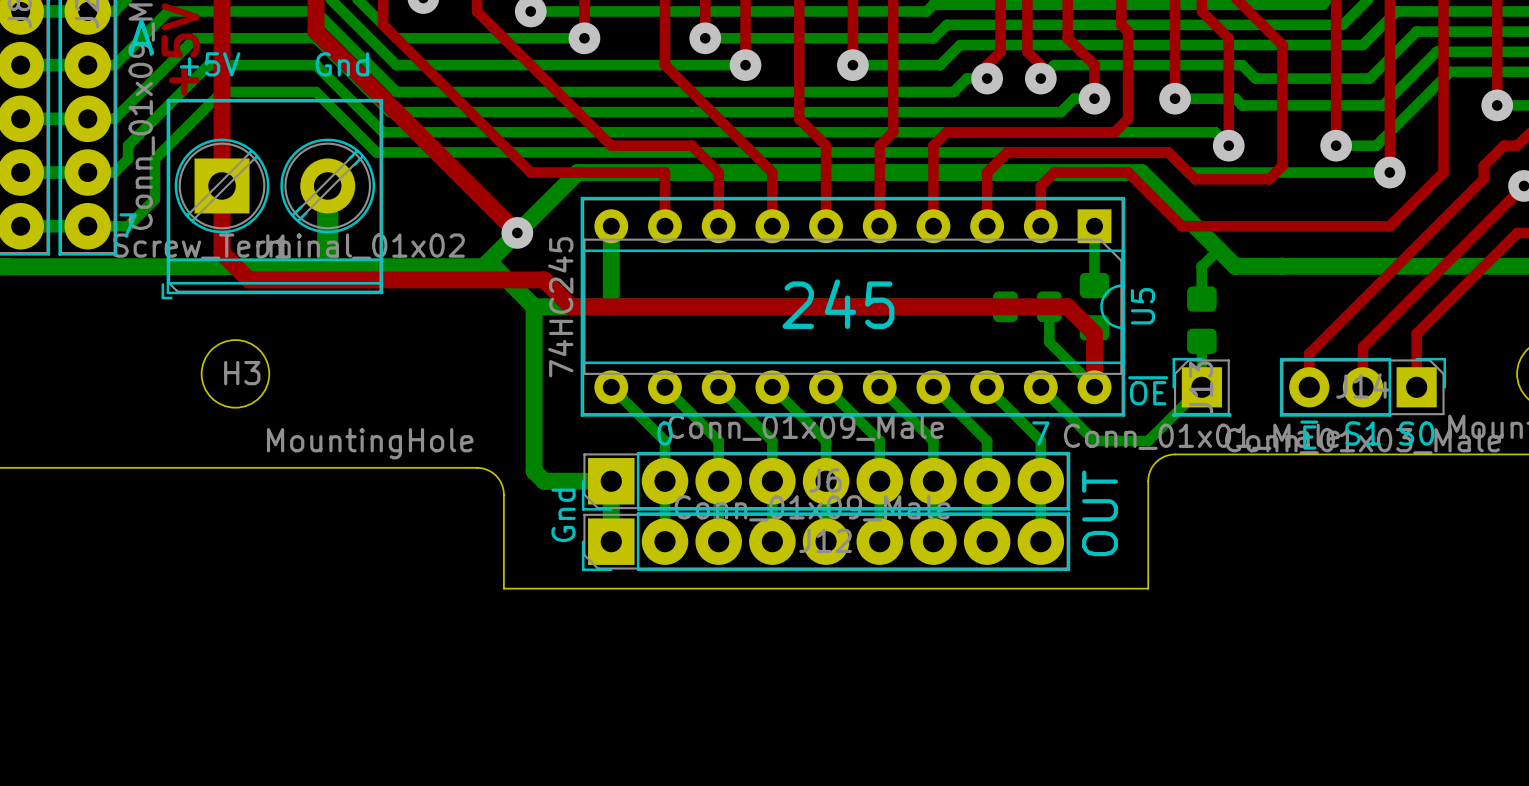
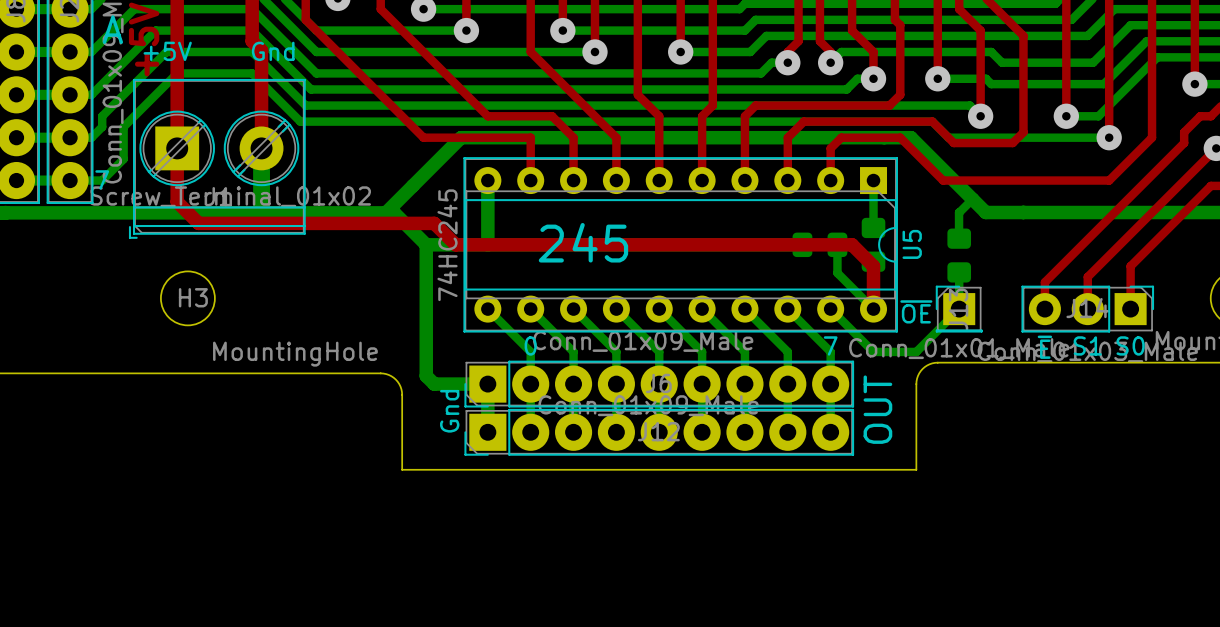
top track: (315, 31) (517, 232) -> (252, 25) (252, 41) (261, 50) (261, 148)
via: (517, 232) -> none
text position: 245 (838, 304) -> 245 (583, 242)

